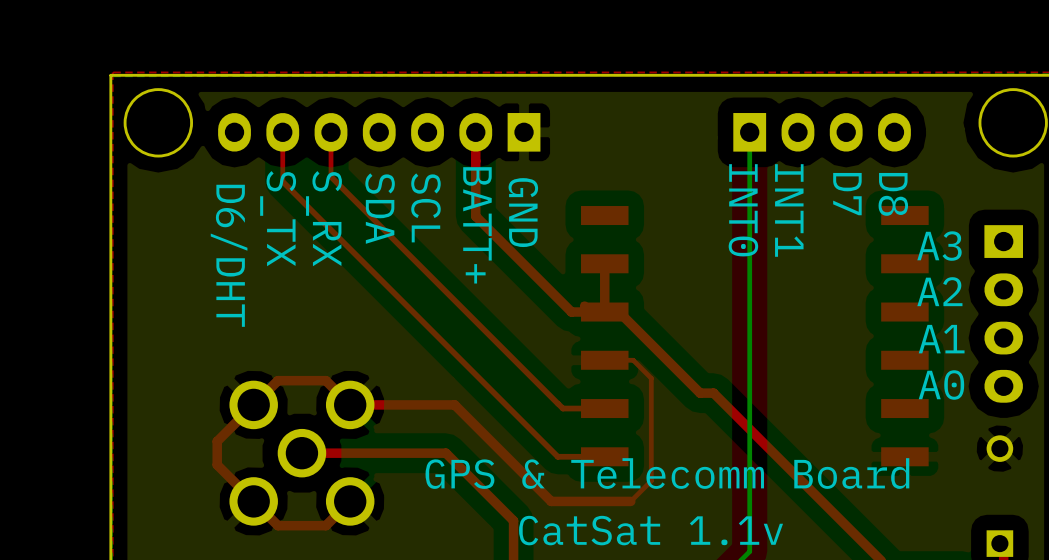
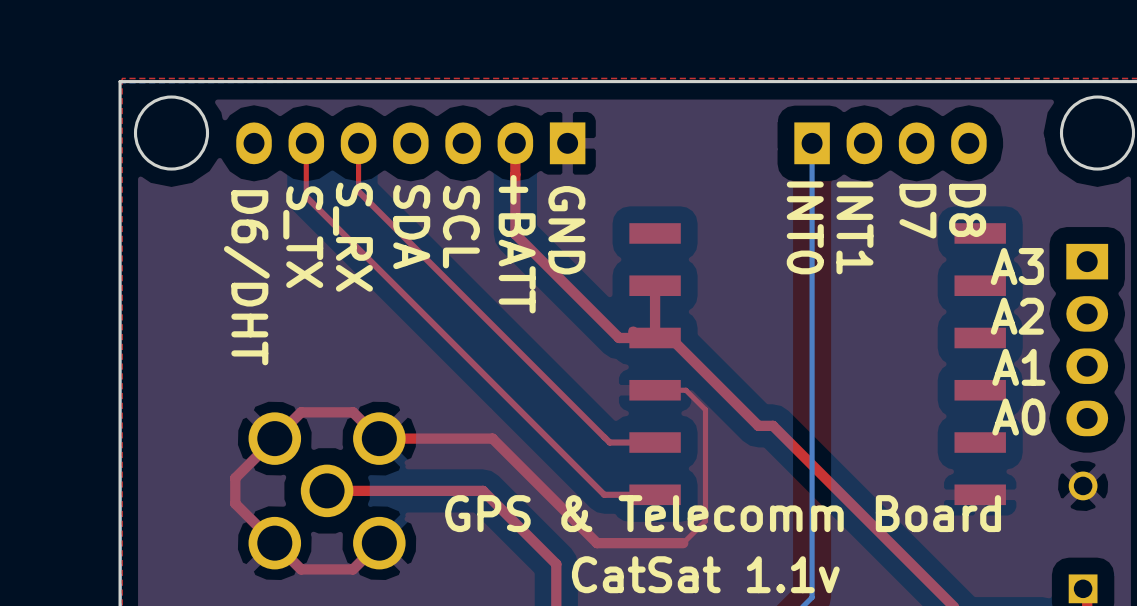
text: BATT+ (477, 225) -> +BATT (517, 244)

